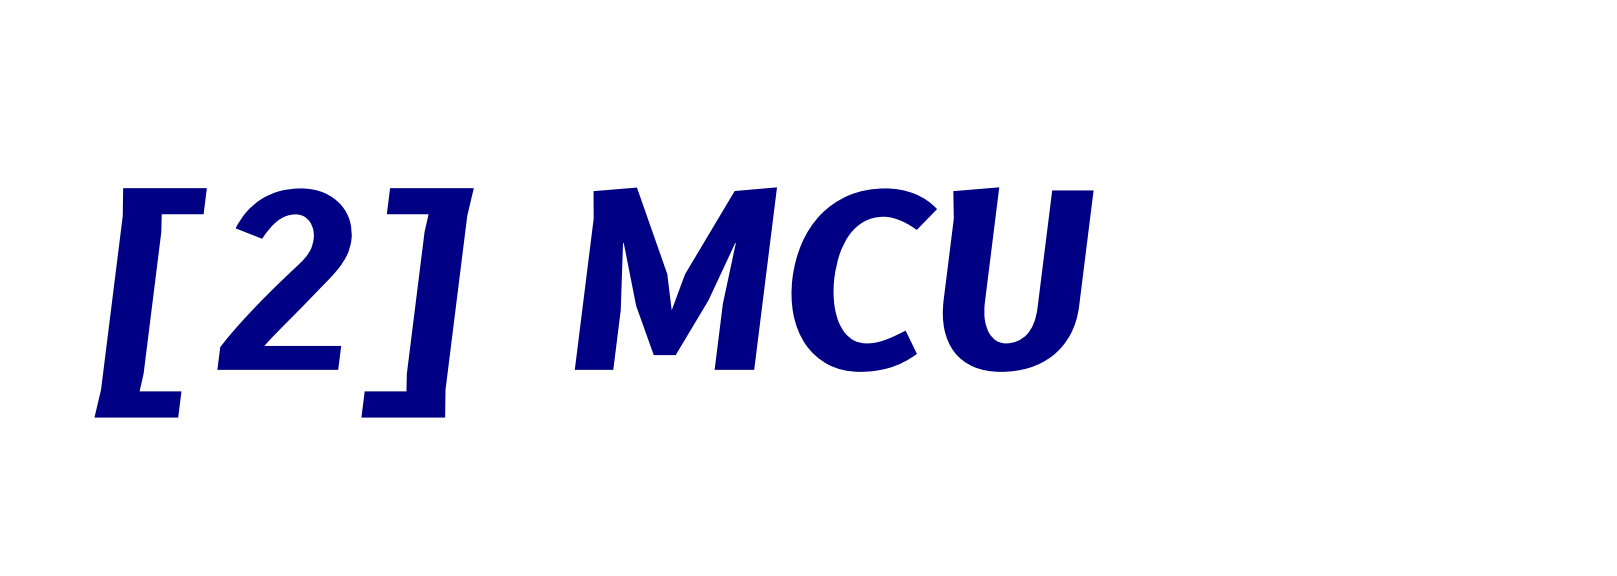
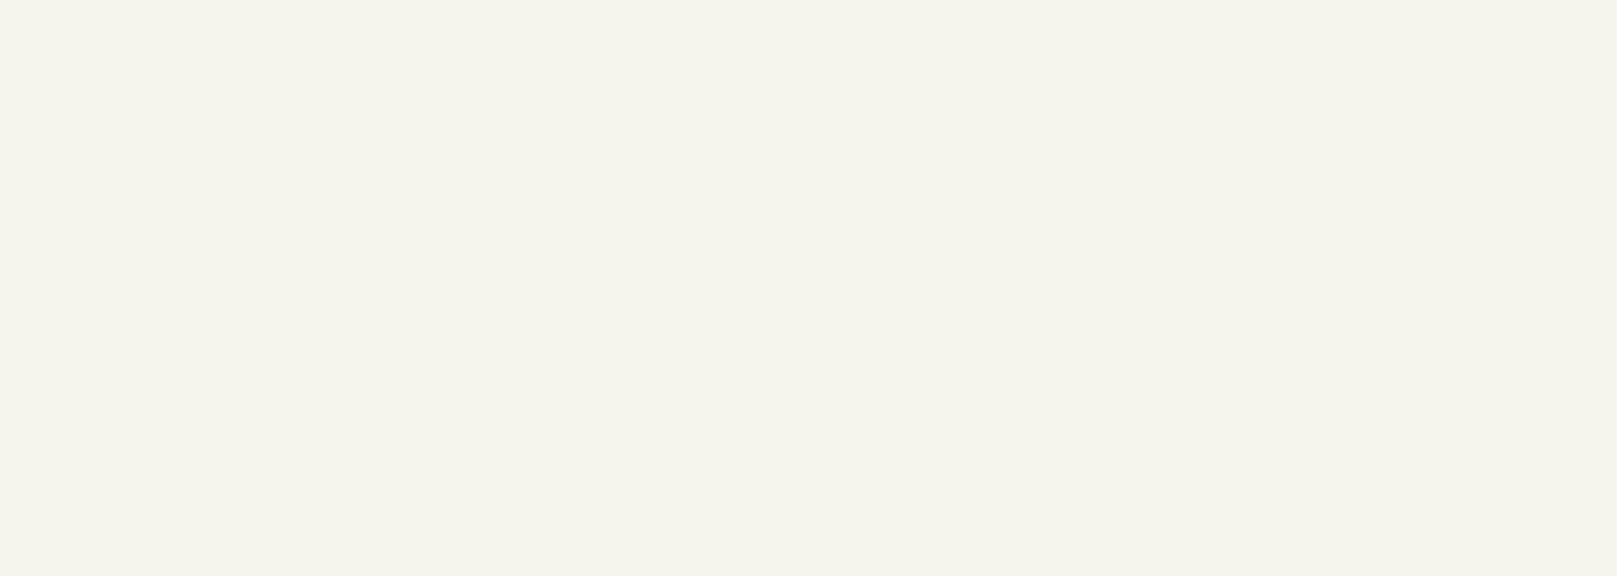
text: [2] MCU (594, 302) -> none

